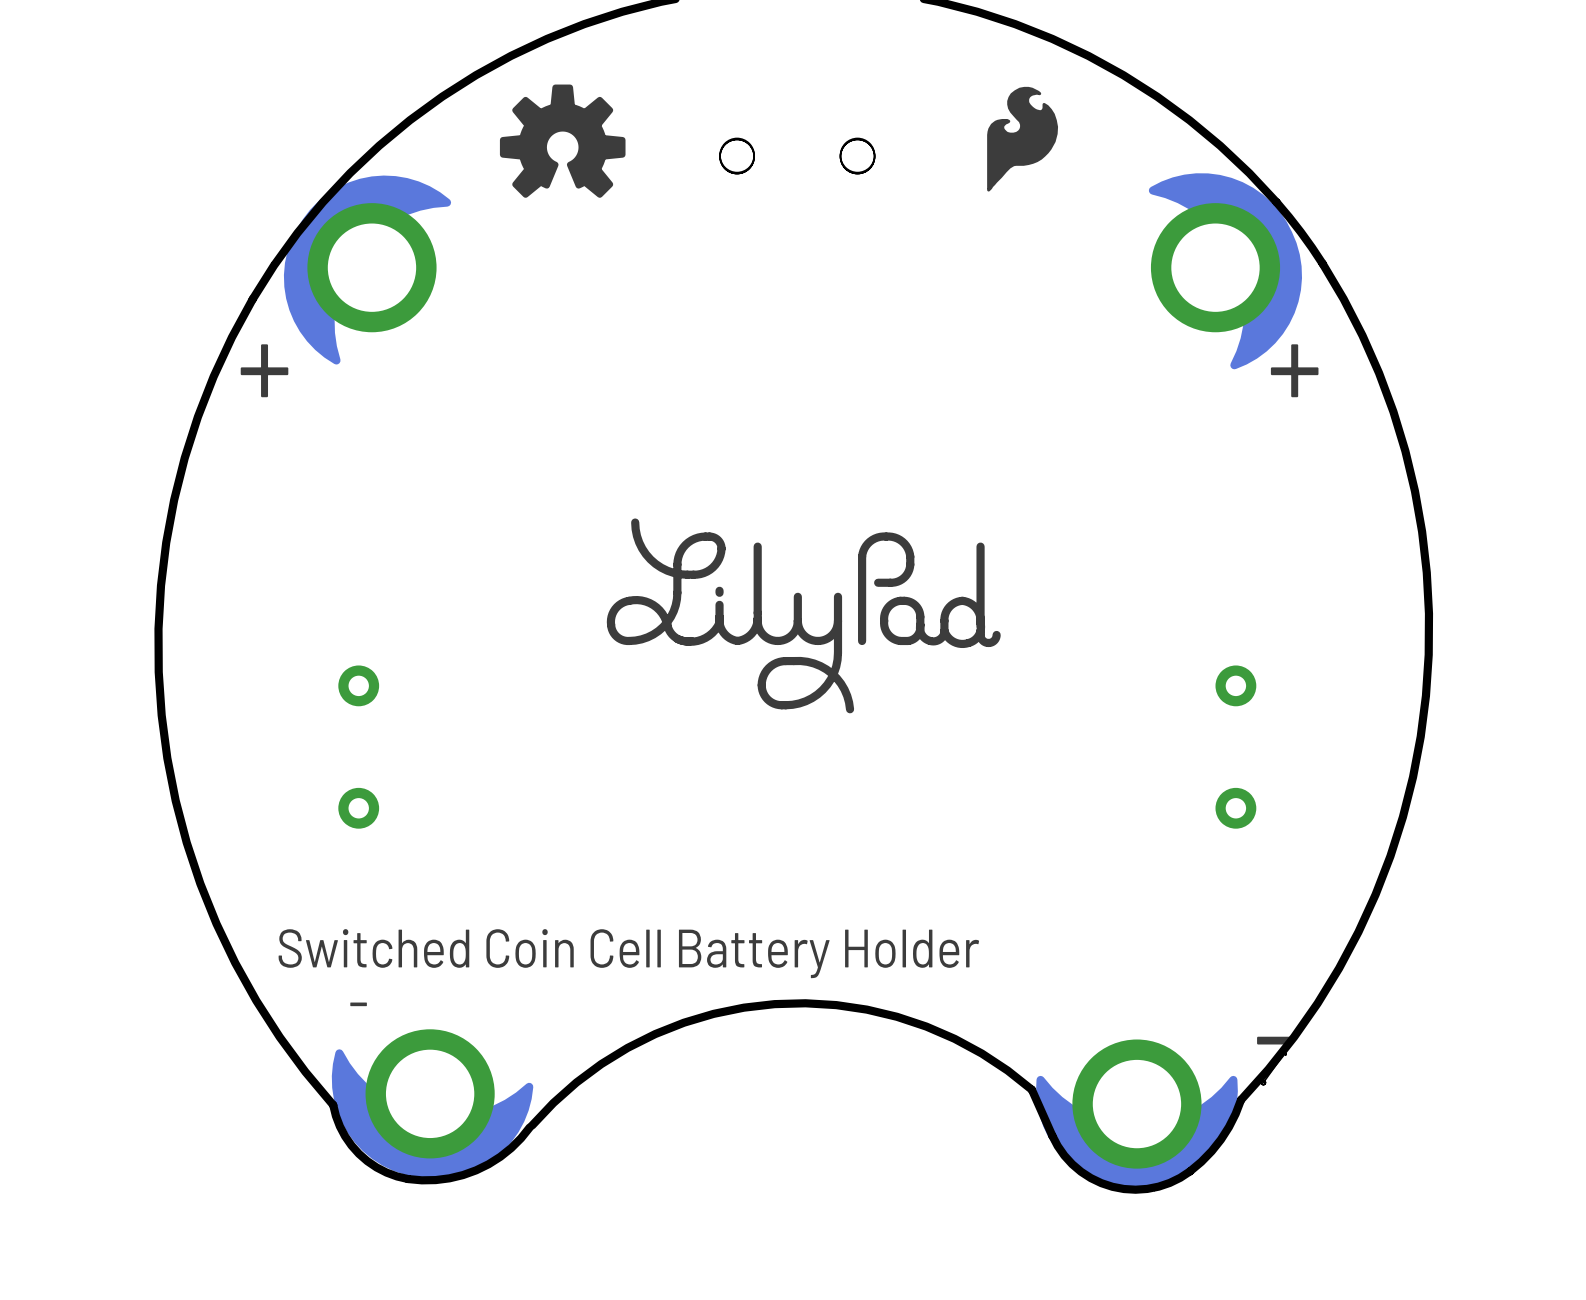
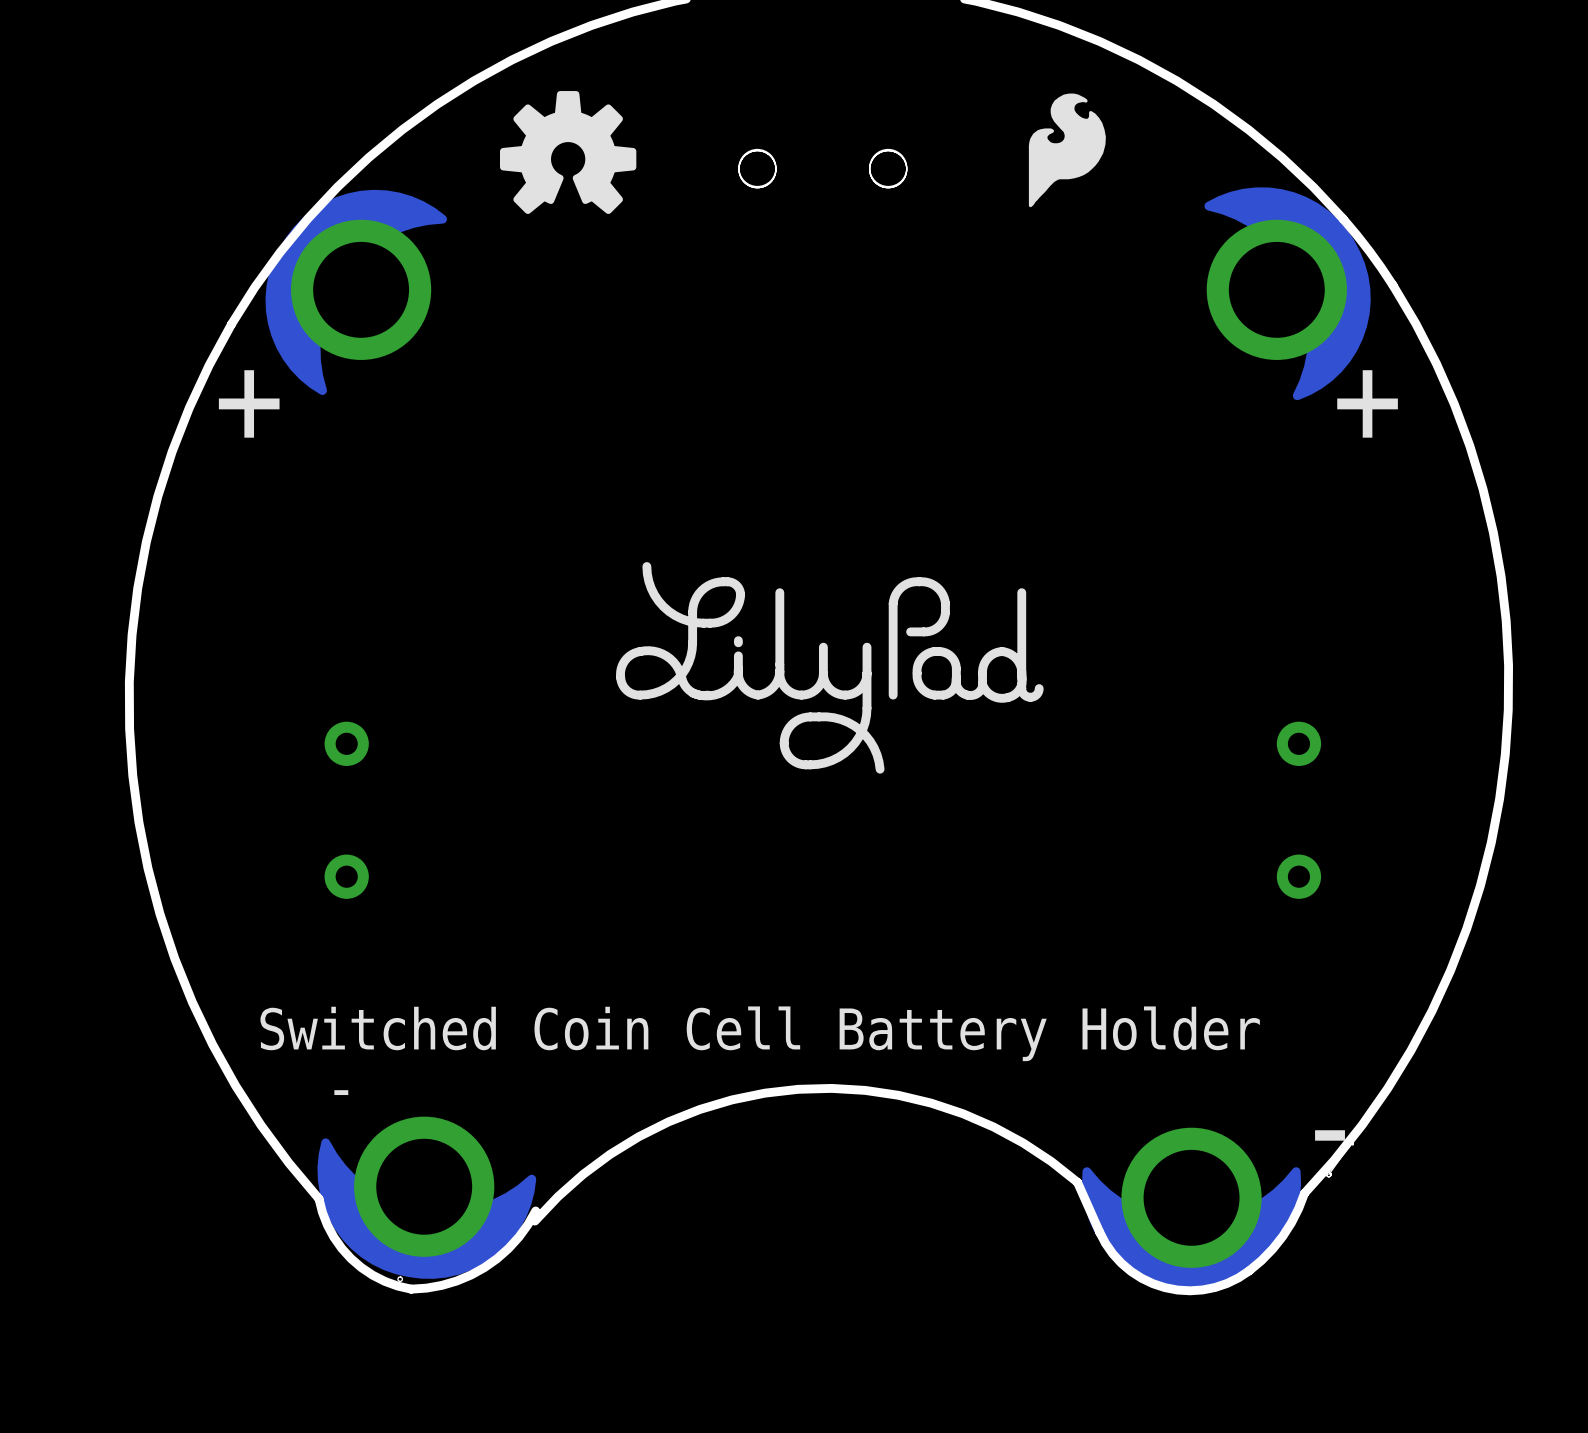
board edge: (407, 1179) (421, 1180) (449, 1178) (476, 1170) (500, 1156) (521, 1138) (529, 1127) (521, 1138) (511, 1148) (500, 1156) (488, 1164) (476, 1170) (463, 1175) (449, 1178) (435, 1180) (421, 1180) (407, 1179) -> (411, 1289) (441, 1285) (470, 1275) (484, 1267) (508, 1248) (528, 1224) (535, 1211) (528, 1224) (519, 1236) (508, 1248) (497, 1258) (484, 1267) (470, 1275) (456, 1281) (441, 1285) (426, 1288) (411, 1289)
board edge: (407, 1179) (376, 1167) (358, 1153) (339, 1126) (333, 1105) (335, 1115) (339, 1126) (351, 1145) (358, 1153) (367, 1161) (376, 1167) (397, 1176) (407, 1179) -> (411, 1289) (397, 1286) (372, 1275) (350, 1258) (333, 1237) (327, 1225) (319, 1198) (322, 1212) (327, 1225) (333, 1237) (341, 1248) (350, 1258) (361, 1267) (372, 1275) (384, 1281) (397, 1286) (411, 1289)

